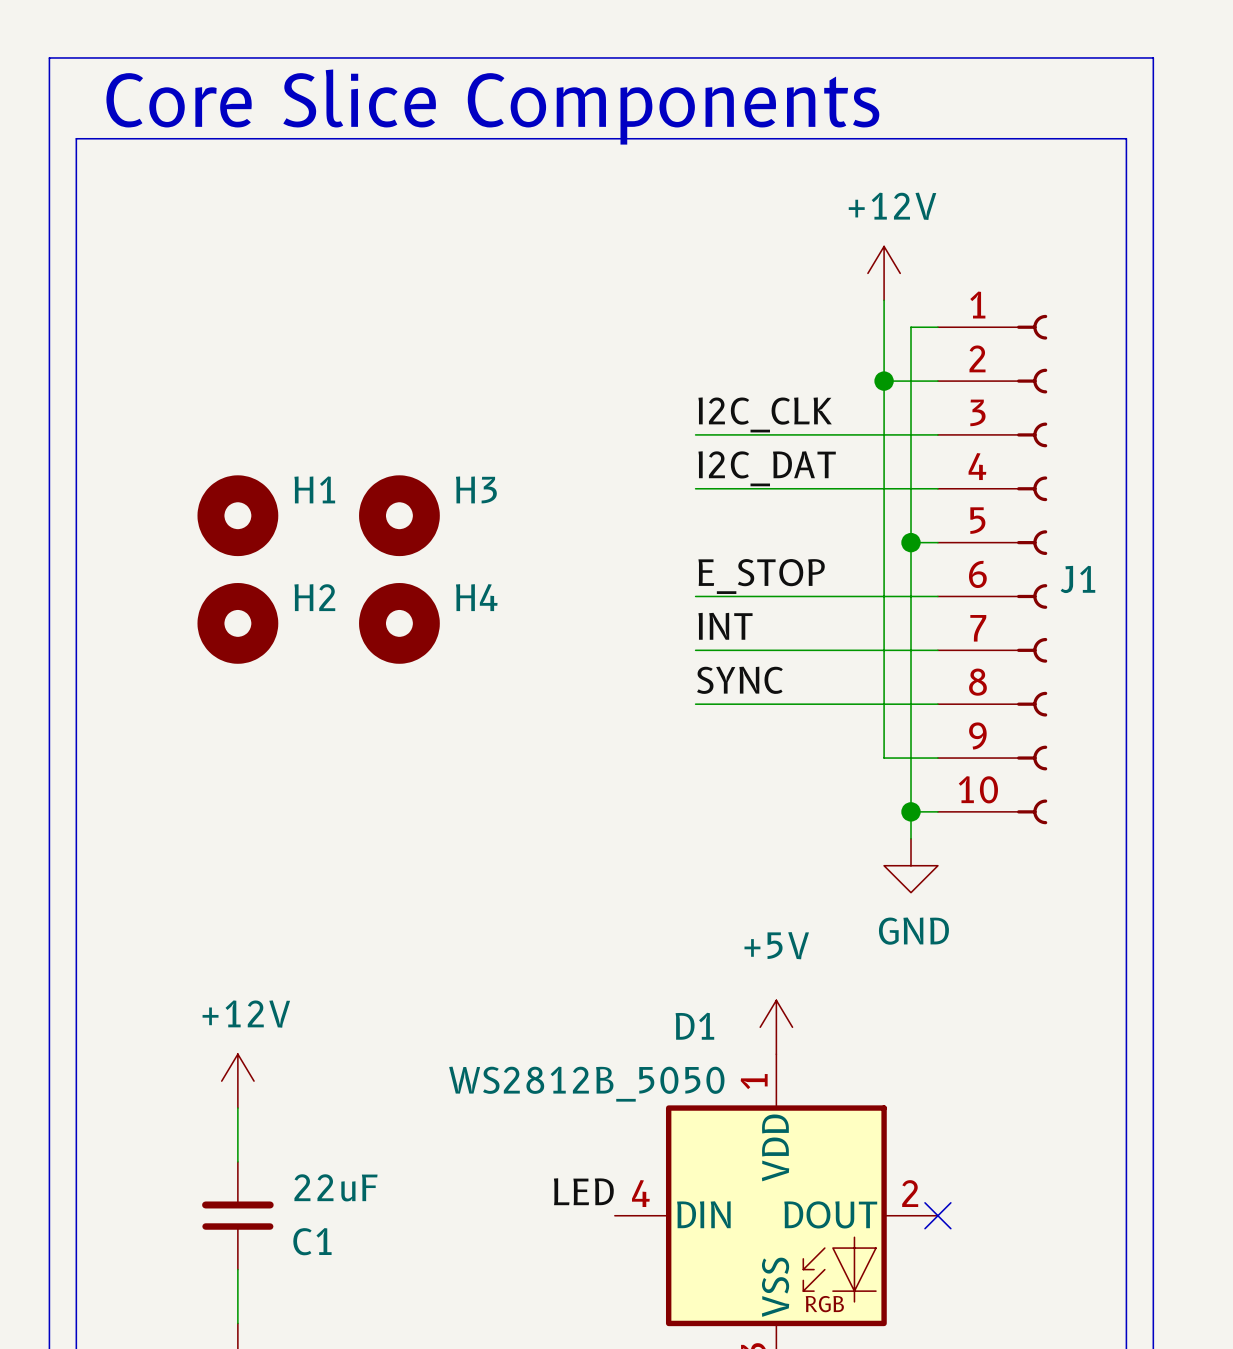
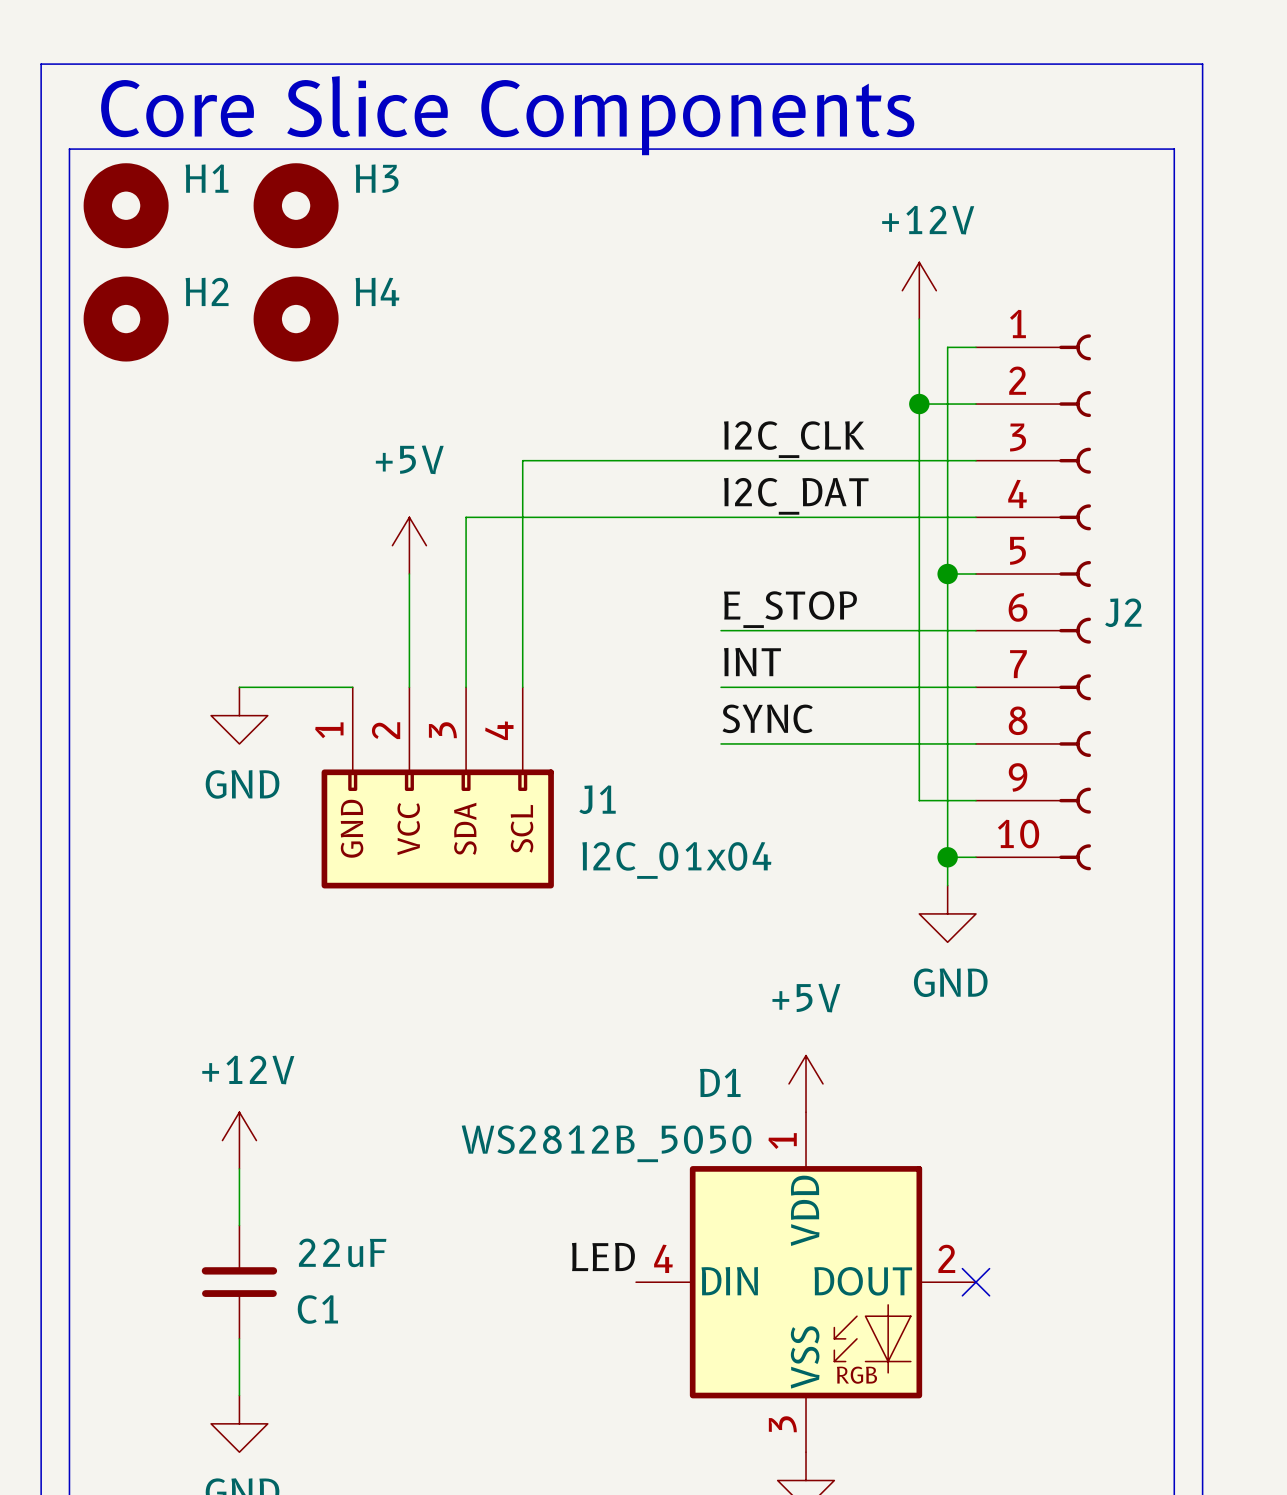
wire: none -> (721, 460) (522, 460) (522, 687)
wire: none -> (721, 517) (466, 517) (466, 687)
H1 position: (237, 515) -> (126, 205)
H3 position: (399, 515) -> (296, 205)
power symbol: none -> +5V (409, 545)
wire: none -> (409, 574) (409, 687)
J1 name: J1 (1077, 579) -> J2 (1123, 612)
H2 position: (237, 623) -> (126, 319)
H4 position: (399, 623) -> (296, 319)
wire: none -> (239, 687) (352, 687)
power symbol: none -> GND (239, 715)
J1: none -> I2C_01x04 (437, 787)

